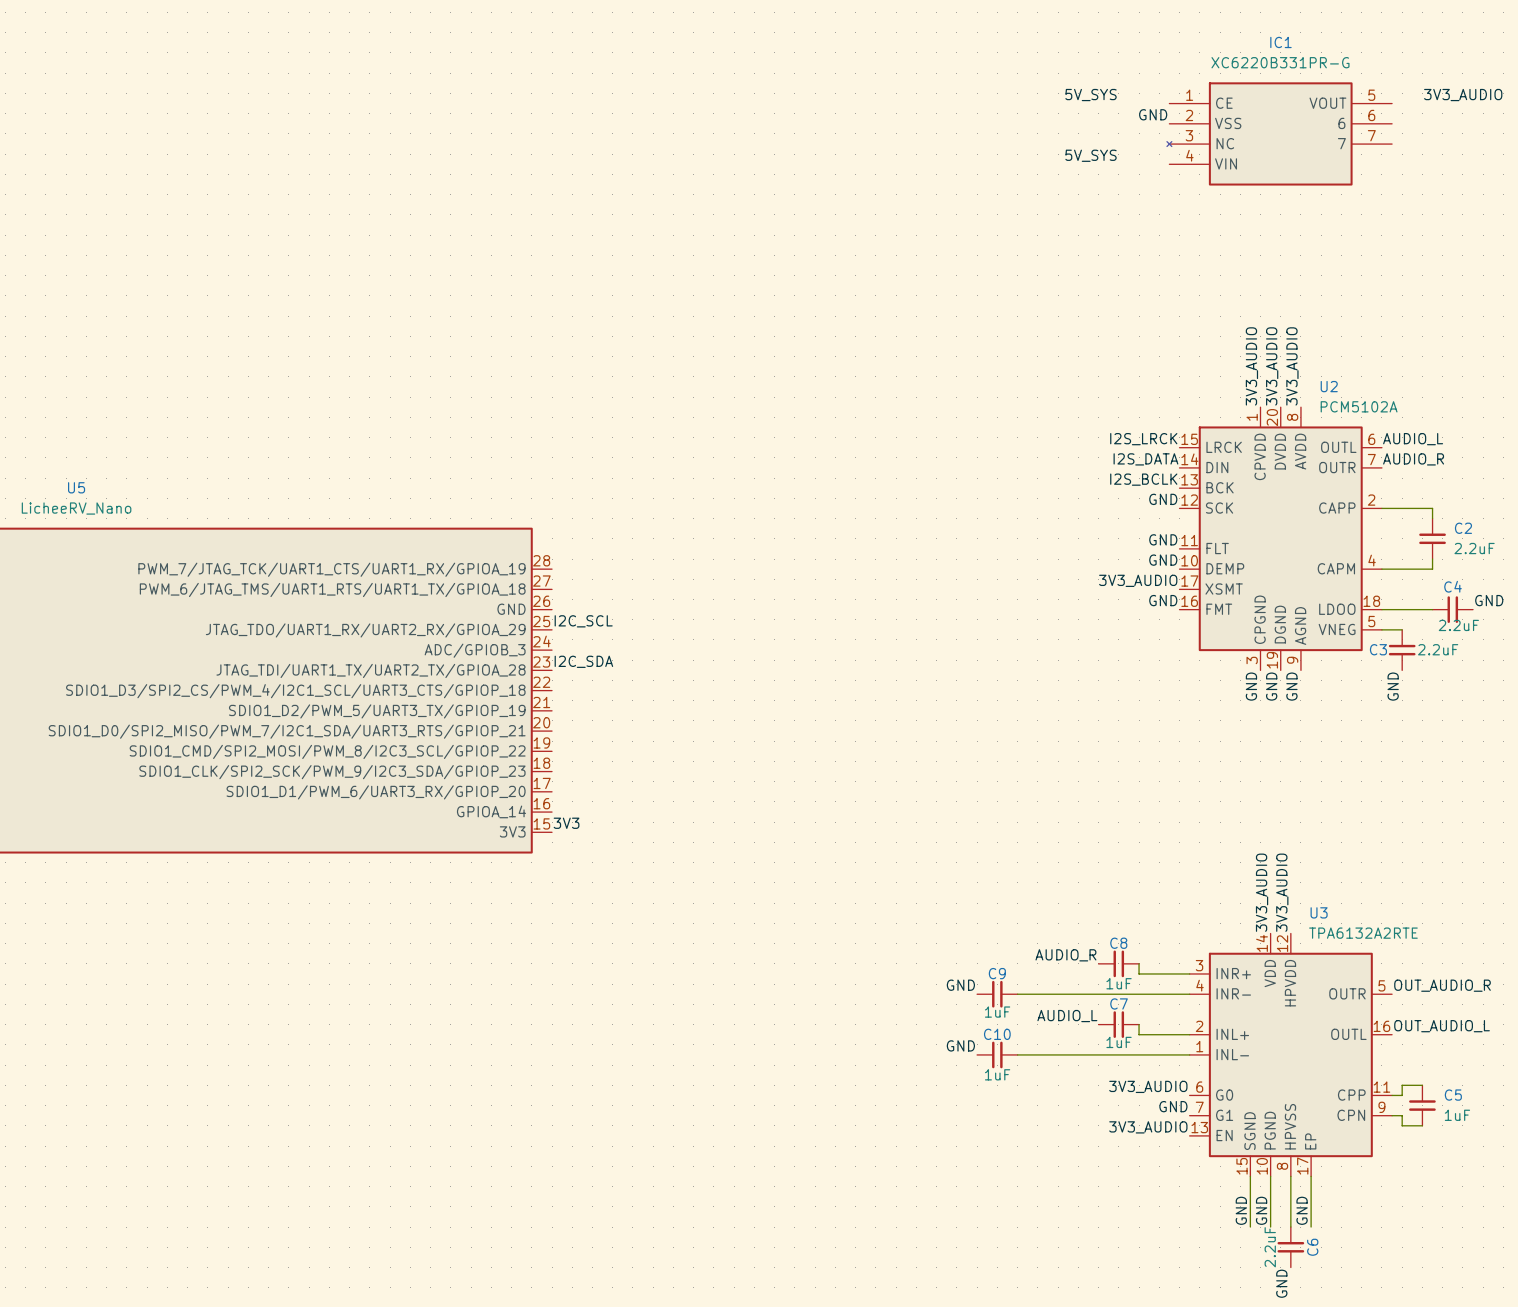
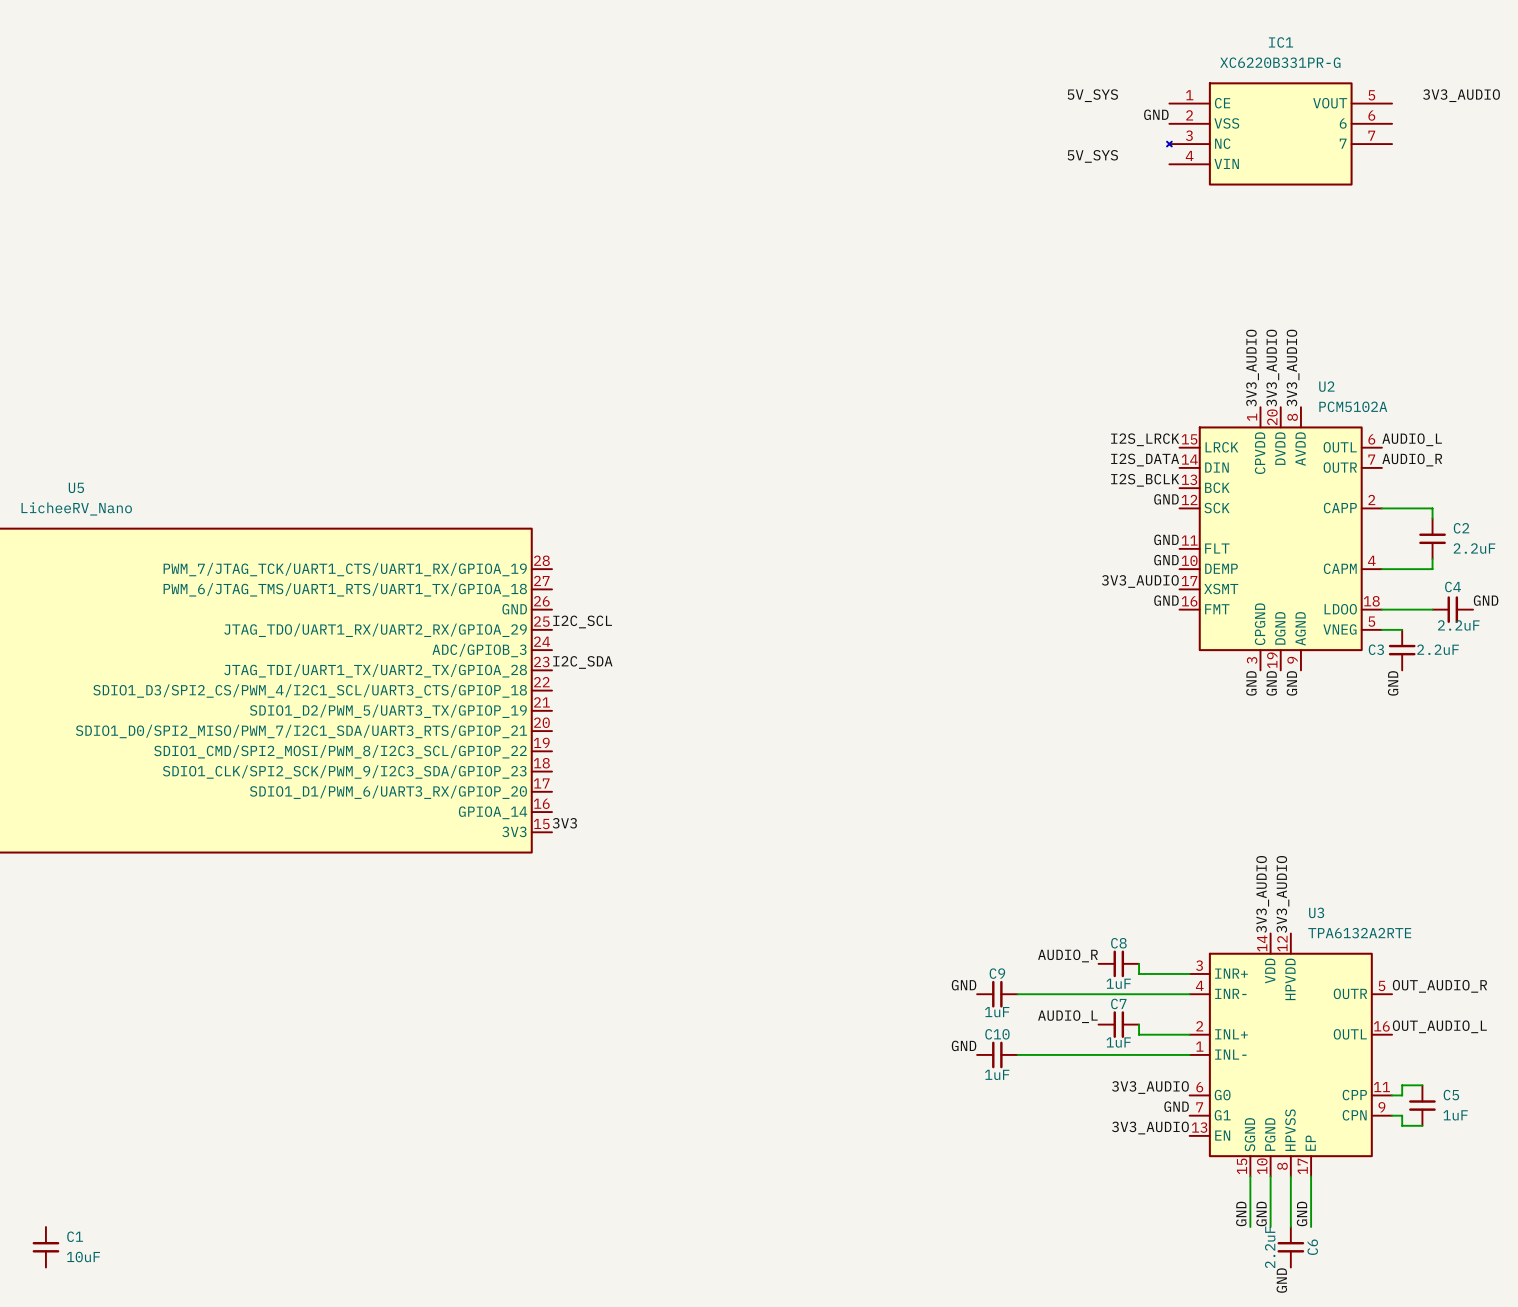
C1: none -> 10uF (45, 1247)

